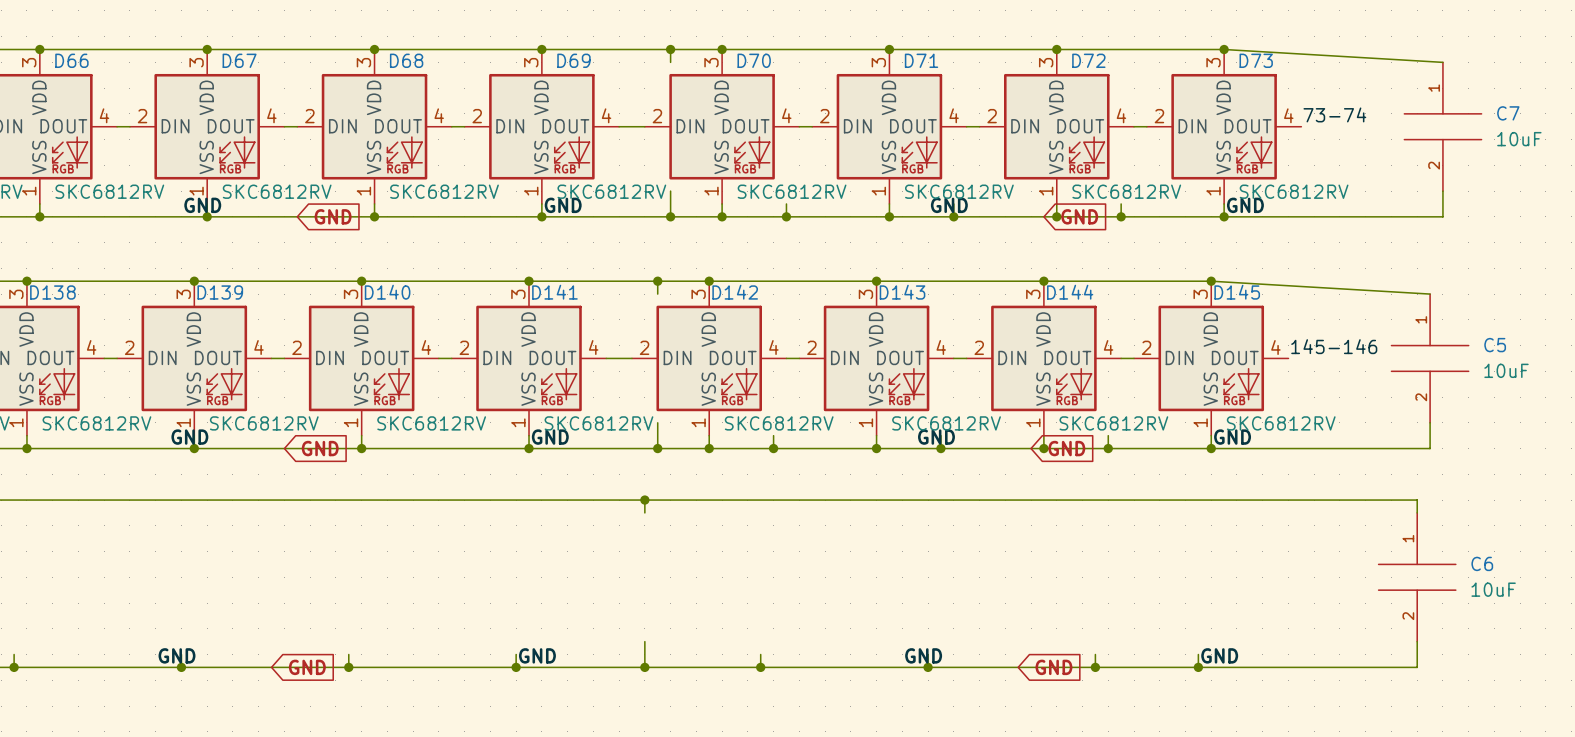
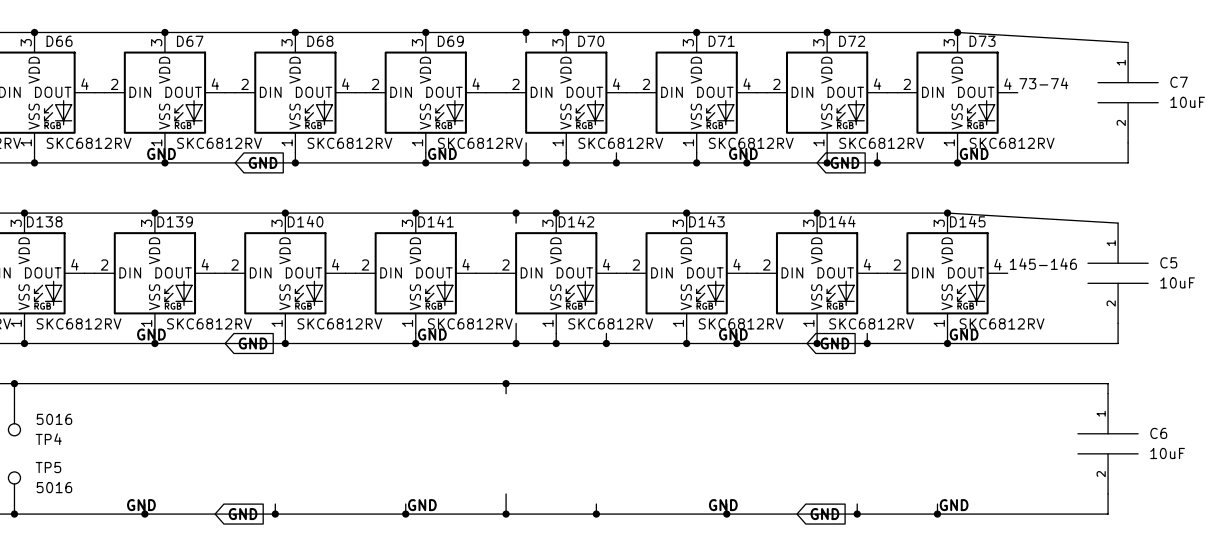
wire: none -> (14, 383) (14, 403)
junction: none -> (14, 383)
TP4: none -> 5016 (14, 419)
TP5: none -> 5016 (14, 487)

